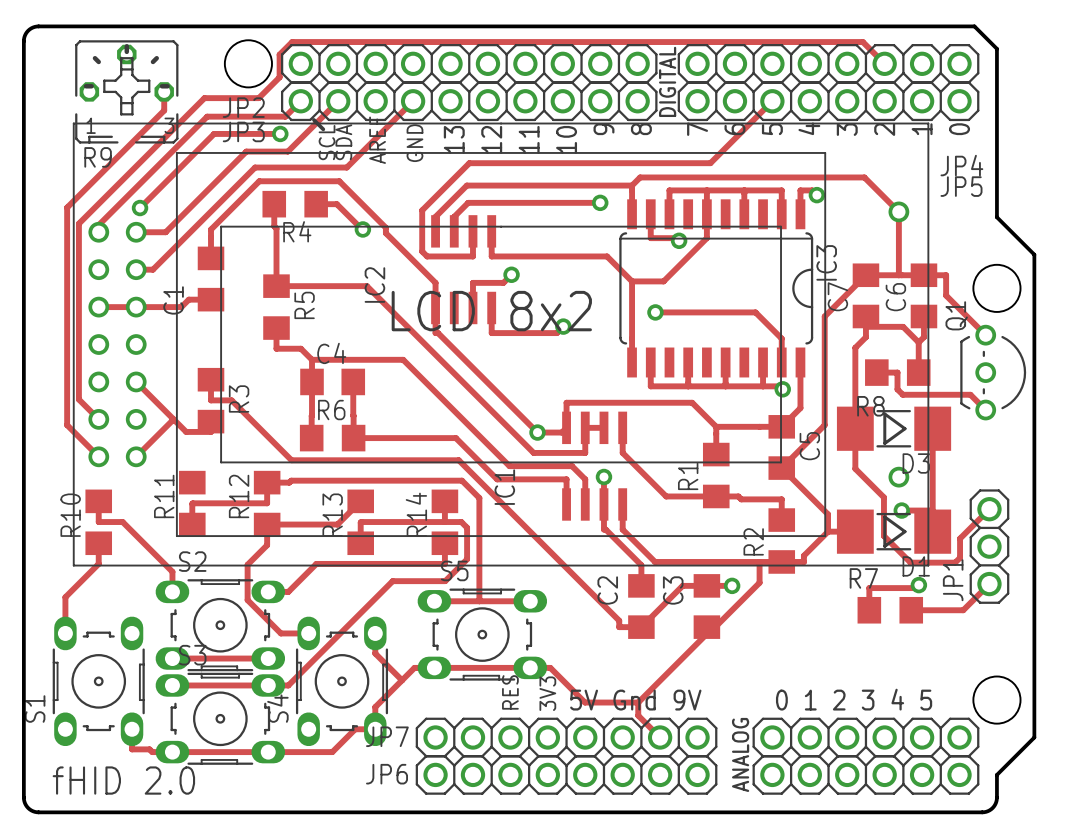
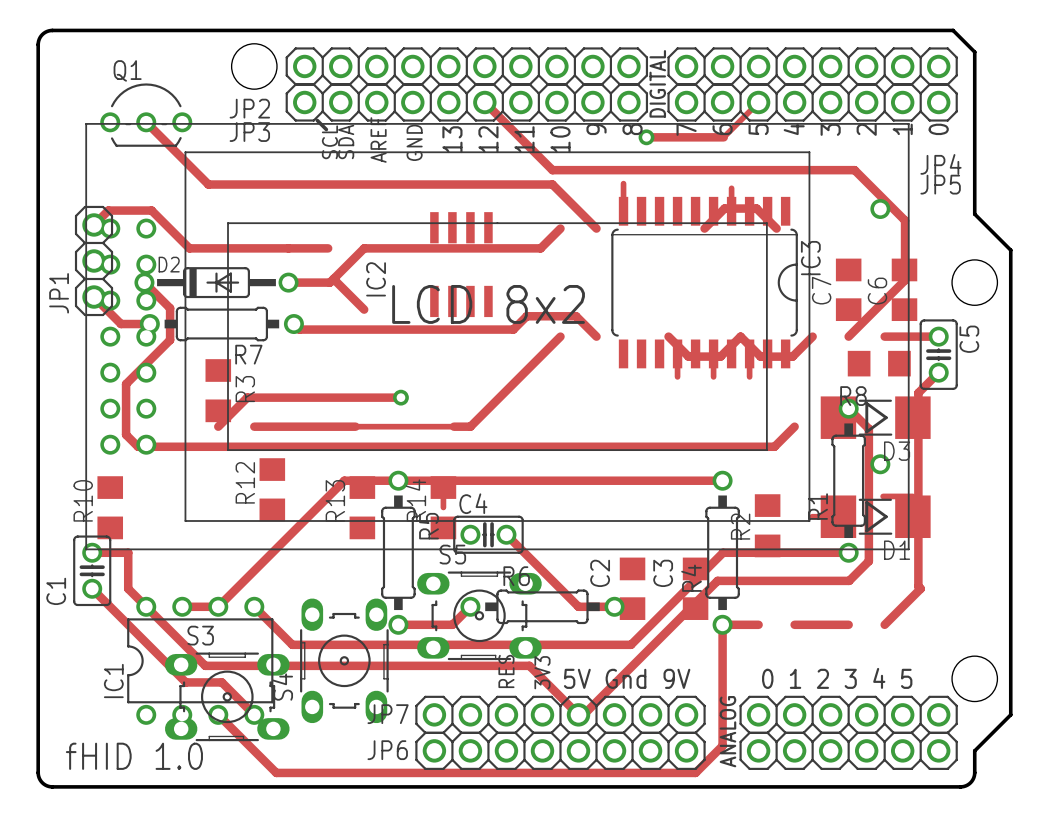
track: (884, 63) (862, 42) (292, 42) (279, 54) (279, 77) (258, 98) (204, 98) (78, 223) (78, 399) (98, 419) -> none
R9: (126, 91) -> none
track: (164, 91) (164, 110) (67, 207) (67, 425) (98, 456) -> none
track: (300, 101) (285, 116) (207, 116) (98, 225) (98, 232) -> none
track: (338, 101) (287, 151) (246, 151) (165, 232) (136, 232) -> none
track: (413, 101) (346, 167) (255, 167) (152, 269) (136, 269) -> none
track: none -> (484, 102) (552, 170) (854, 170) (905, 220) (905, 280) (848, 336)
track: none -> (146, 122) (208, 184) (552, 184) (596, 228)
track: (280, 133) (214, 133) (140, 208) -> none
via: (280, 133) -> none
via: none -> (646, 137)
track: (736, 137) (710, 163) (469, 163) (422, 210) (422, 251) (427, 256) (472, 256) (472, 231) -> (723, 137) (646, 137)
R4 footprint: [262, 190, 328, 218] -> [705, 470, 740, 635]
track: (706, 190) (706, 238) (663, 281) (632, 281) -> none
track: (816, 195) (812, 190) (800, 190) (800, 214) -> none
via: (816, 195) -> none
track: (600, 202) (468, 202) (454, 216) (454, 231) -> none
via: (600, 202) -> none
track: (274, 204) (274, 226) (276, 228) (276, 286) (366, 286) (533, 452) (585, 452) (585, 427) (603, 427) -> none
track: (316, 204) (336, 204) (362, 229) -> none
via: (140, 208) -> none
track: (650, 214) (650, 238) (676, 238) (679, 240) -> none
track: (669, 214) (669, 190) (781, 190) (781, 214) -> none
track: none -> (94, 224) (108, 210) (151, 210) (189, 248) (328, 248)
via: (362, 229) -> none
track: (435, 231) (435, 216) (466, 185) (632, 185) (640, 177) (864, 177) (898, 211) (898, 275) -> none
track: (491, 231) (491, 256) (607, 256) (632, 281) -> none
track: none -> (560, 228) (540, 248) (364, 248) (329, 282) (288, 282)
track: none -> (704, 228) (724, 208) (756, 208) (776, 228)
via: (679, 240) -> none
C1 footprint: [197, 246, 225, 312] -> [73, 535, 112, 607]
track: (211, 258) (211, 229) (259, 181) (339, 181) (385, 227) (385, 233) (435, 282) (435, 333) (438, 333) (537, 432) (561, 432) (566, 427) (566, 402) (692, 402) (716, 426) -> none
R5 footprint: [263, 274, 290, 340] -> [381, 470, 416, 635]
track: (511, 274) (503, 282) (472, 282) (472, 307) -> none
via: (511, 274) -> none
track: (632, 281) (632, 362) -> none
track: none -> (333, 279) (364, 309)
track: none -> (144, 282) (170, 308) (170, 340) (126, 384) (126, 434) (138, 446) (774, 446) (794, 426)
D2: none -> (216, 282)
track: (211, 299) (188, 299) (181, 307) (98, 307) -> none
track: none -> (94, 297) (121, 324) (149, 324)
track: (491, 307) (491, 333) (556, 333) (563, 326) -> none
track: (655, 312) (755, 312) (781, 338) (781, 362) -> none
via: (655, 312) -> none
track: (865, 316) (865, 337) (855, 347) (855, 468) (883, 497) (883, 536) (910, 562) (955, 562) (960, 557) (960, 538) (989, 509) -> none
track: (923, 316) (923, 337) (918, 342) -> none
via: (563, 326) -> none
track: (865, 326) (903, 326) (918, 342) -> none
track: (276, 328) (276, 348) (300, 348) (312, 359) -> none
track: none -> (293, 324) (299, 329) (513, 329) (526, 316) (576, 316) (596, 336)
track: (985, 335) (946, 295) (946, 275) (865, 275) (824, 316) (824, 425) (781, 468) (828, 514) (828, 531) (803, 555) (803, 561) (655, 561) (622, 529) (622, 504) -> none
track: (918, 342) (918, 372) -> none
track: none -> (668, 336) (688, 356) (720, 356) (740, 336) (760, 356) (792, 356) (812, 336)
track: none -> (884, 336) (938, 336)
track: (312, 359) (403, 359) (509, 466) (572, 466) (585, 479) (585, 504) -> none
track: (312, 359) (311, 438) -> none
track: (650, 362) (650, 386) (779, 386) (782, 389) -> none
track: (800, 362) (800, 408) (781, 426) (716, 426) -> none
C4 footprint: [300, 368, 366, 396] -> [453, 515, 524, 554]
track: (876, 372) (897, 372) (897, 389) (902, 394) (970, 394) (985, 410) -> none
Q1 rotation: 0° (993, 372) -> 90° counterclockwise (146, 115)
Q1 position: (993, 372) -> (146, 115)
track: (211, 379) (211, 400) (231, 400) (291, 460) (458, 460) (619, 620) (619, 627) (641, 627) (682, 585) (732, 585) -> none
track: (136, 381) (186, 431) (211, 431) (211, 421) -> none
track: (353, 381) (353, 438) -> (254, 426) (355, 426)
track: none -> (938, 372) (918, 392) (918, 586) (920, 588) (884, 624)
via: (782, 389) -> none
track: none -> (400, 397) (247, 397) (218, 426)
via: none -> (400, 397)
IC1 footprint: [562, 411, 628, 521] -> [127, 596, 274, 725]
C5 footprint: [768, 415, 796, 480] -> [919, 319, 958, 390]
track: (173, 419) (136, 456) -> none
track: none -> (848, 408) (868, 428) (868, 561) (849, 580) (717, 580) (583, 714) (578, 714) (529, 665) (205, 665) (128, 588) (128, 552) (92, 552)
R6 footprint: [299, 424, 366, 452] -> [460, 589, 625, 625]
track: (716, 426) (716, 454) -> none
track: (622, 427) (622, 452) (666, 496) (738, 496) (741, 499) (781, 499) (781, 520) -> none
track: (932, 428) (932, 531) -> none
via: (537, 432) -> none
track: (455, 438) (497, 479) (566, 479) (566, 504) -> (453, 426) (470, 426) (560, 336)
R1 footprint: [702, 442, 730, 509] -> [831, 398, 866, 563]
track: (603, 476) (603, 529) (641, 565) (641, 585) -> none
via: (603, 476) -> none
track: none -> (722, 480) (344, 480) (218, 606) (182, 606)
track: (98, 501) (98, 522) (122, 522) (172, 571) (172, 591) -> none
track: (360, 501) (337, 524) (267, 524) (267, 545) (247, 564) (247, 600) (280, 633) (308, 633) -> none
R11: (192, 503) -> none
via: (901, 510) -> none
track: (192, 524) (192, 503) (267, 503) (267, 482) (289, 482) (291, 480) (461, 480) (479, 498) (479, 601) -> none
track: (98, 543) (98, 563) (65, 597) (65, 633) -> none
track: (360, 543) (361, 522) (461, 522) (467, 527) (467, 559) (445, 581) (392, 581) (288, 685) (172, 685) -> none
track: (444, 543) (444, 563) (316, 563) (288, 591) (268, 591) -> none
JP1 position: (989, 546) -> (94, 260)
track: none -> (506, 534) (578, 606) (614, 606)
track: (759, 561) (759, 582) (710, 632) (706, 632) -> none
track: none -> (848, 552) (723, 552) (631, 644) (292, 644) (254, 606)
R7 name position: R7 (863, 578) -> R7 (248, 354)
track: (989, 584) (963, 610) (911, 610) -> none
via: (732, 585) -> none
track: (918, 585) (915, 588) (869, 588) (869, 610) -> none
via: (918, 585) -> none
R7 footprint: [857, 596, 924, 624] -> [139, 306, 304, 342]
track: (434, 601) (530, 601) -> none
track: none -> (92, 588) (185, 682) (221, 682) (254, 714)
S2: (220, 625) -> none
track: none -> (470, 606) (452, 624) (398, 624)
track: (706, 627) (706, 633) (638, 702) -> none
track: (375, 633) (375, 653) (402, 680) -> none
track: none -> (758, 624) (722, 624) (722, 745) (695, 772) (276, 772) (218, 714)
track: none -> (794, 624) (848, 624)
track: (172, 658) (268, 658) -> none
S1: (98, 681) -> none
track: (638, 702) (585, 702) (550, 667) (414, 667) (375, 707) (375, 729) (355, 729) (332, 752) (152, 752) (149, 749) (132, 749) (132, 729) -> none
track: (638, 702) (638, 715) (660, 737) -> none
text: fHID 2.0 (123, 780) -> fHID 1.0 (134, 756)

